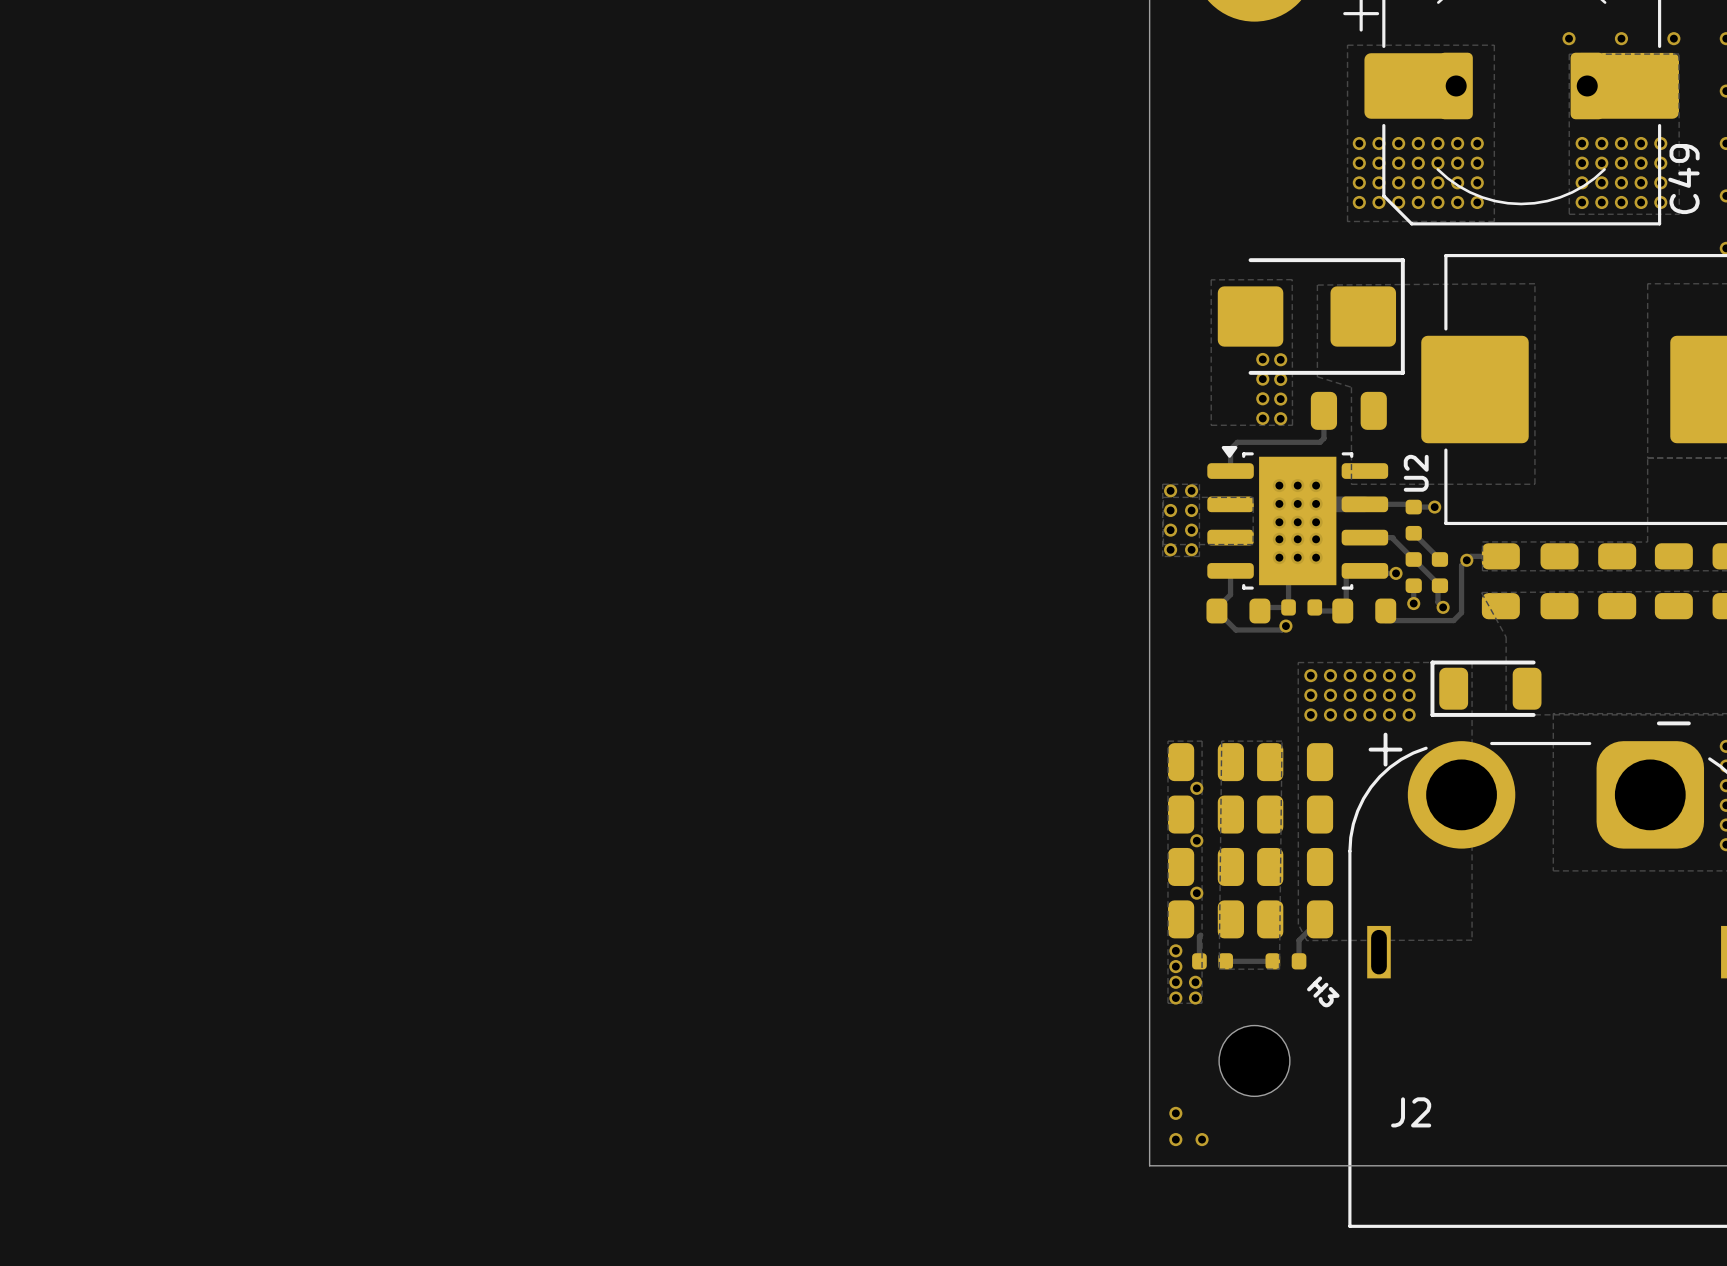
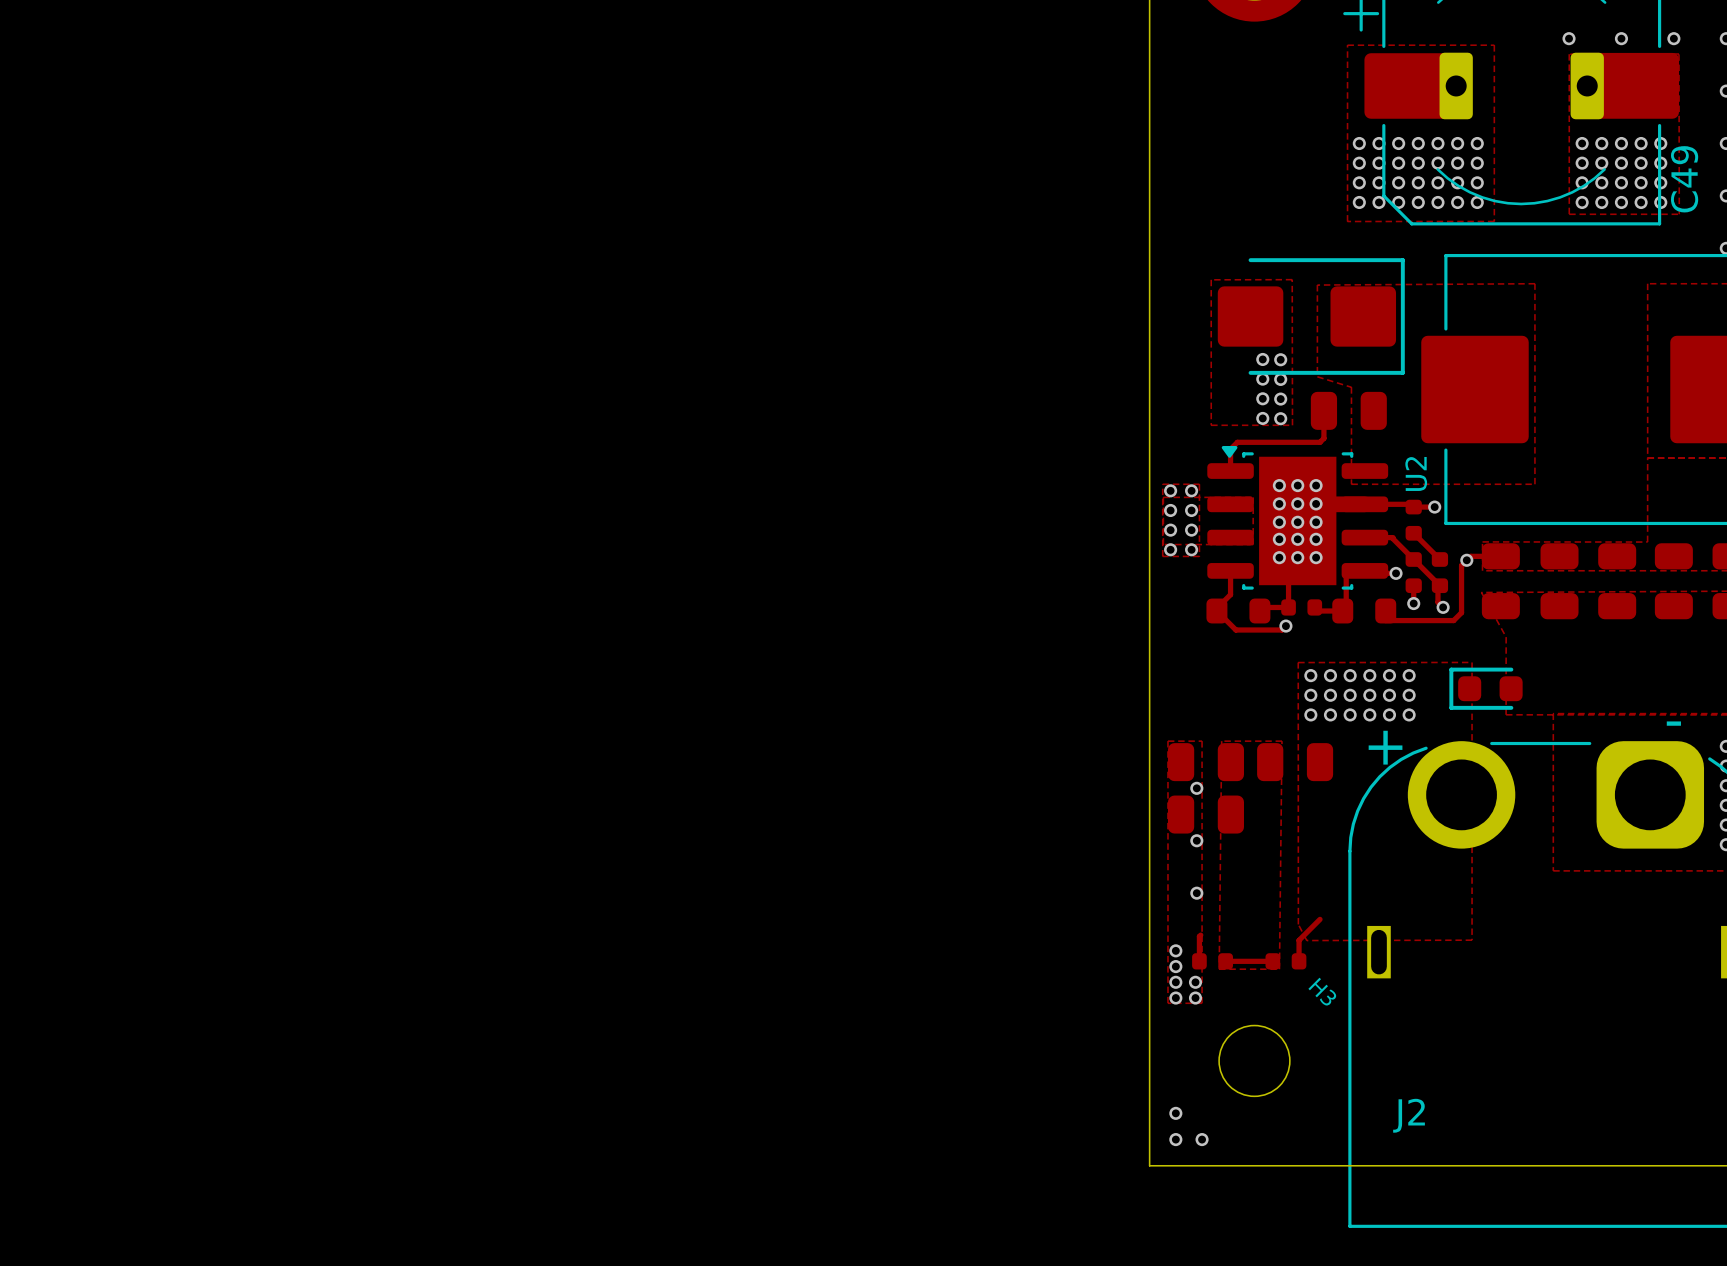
part footprint: [1430, 660, 1542, 717] -> [1449, 667, 1523, 710]
part: (1295, 814) -> none
part: (1205, 866) -> none
part: (1295, 866) -> none
part: (1205, 919) -> none
part: (1295, 919) -> none

